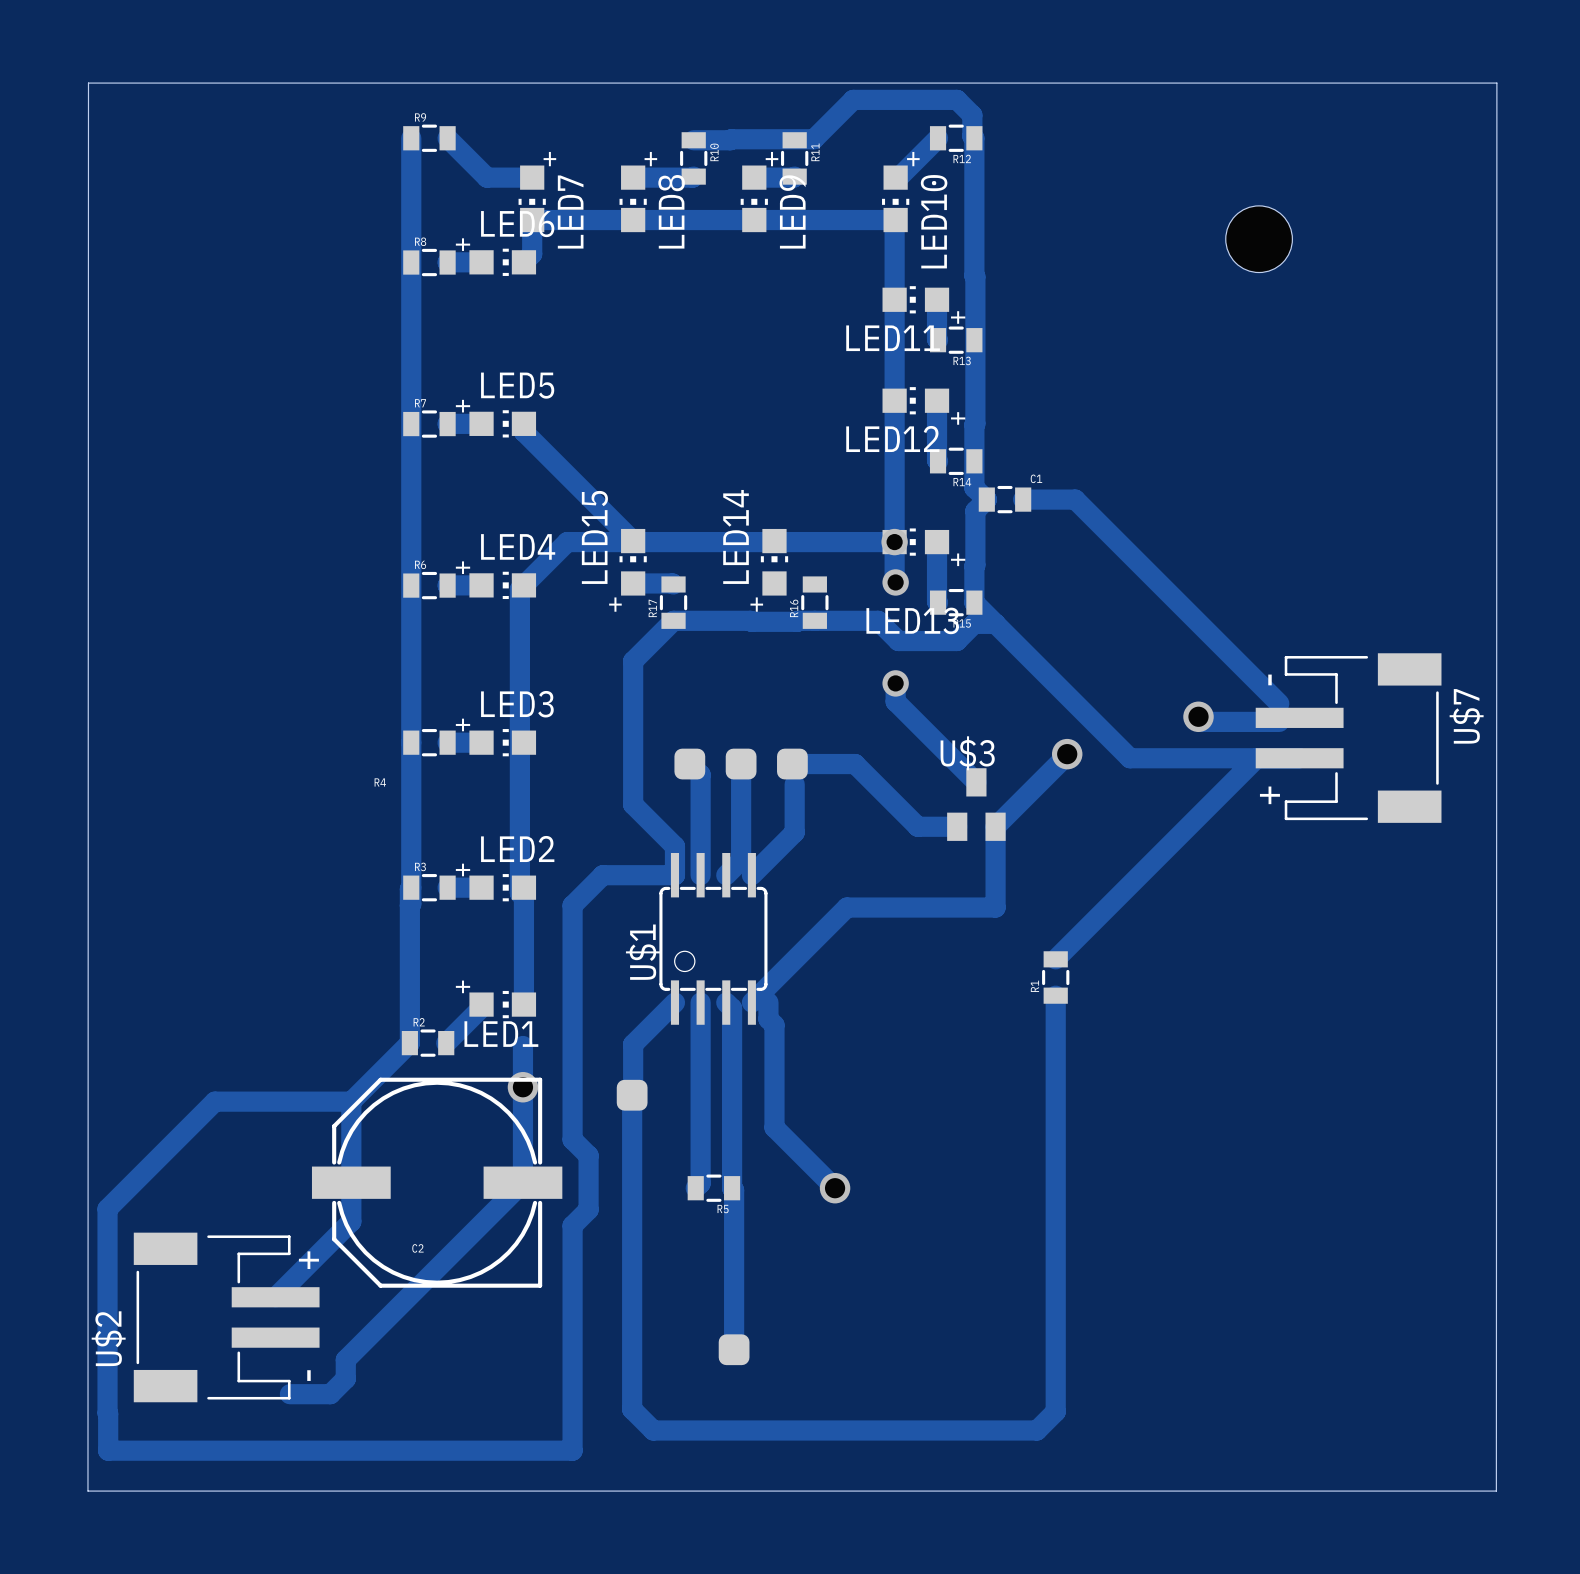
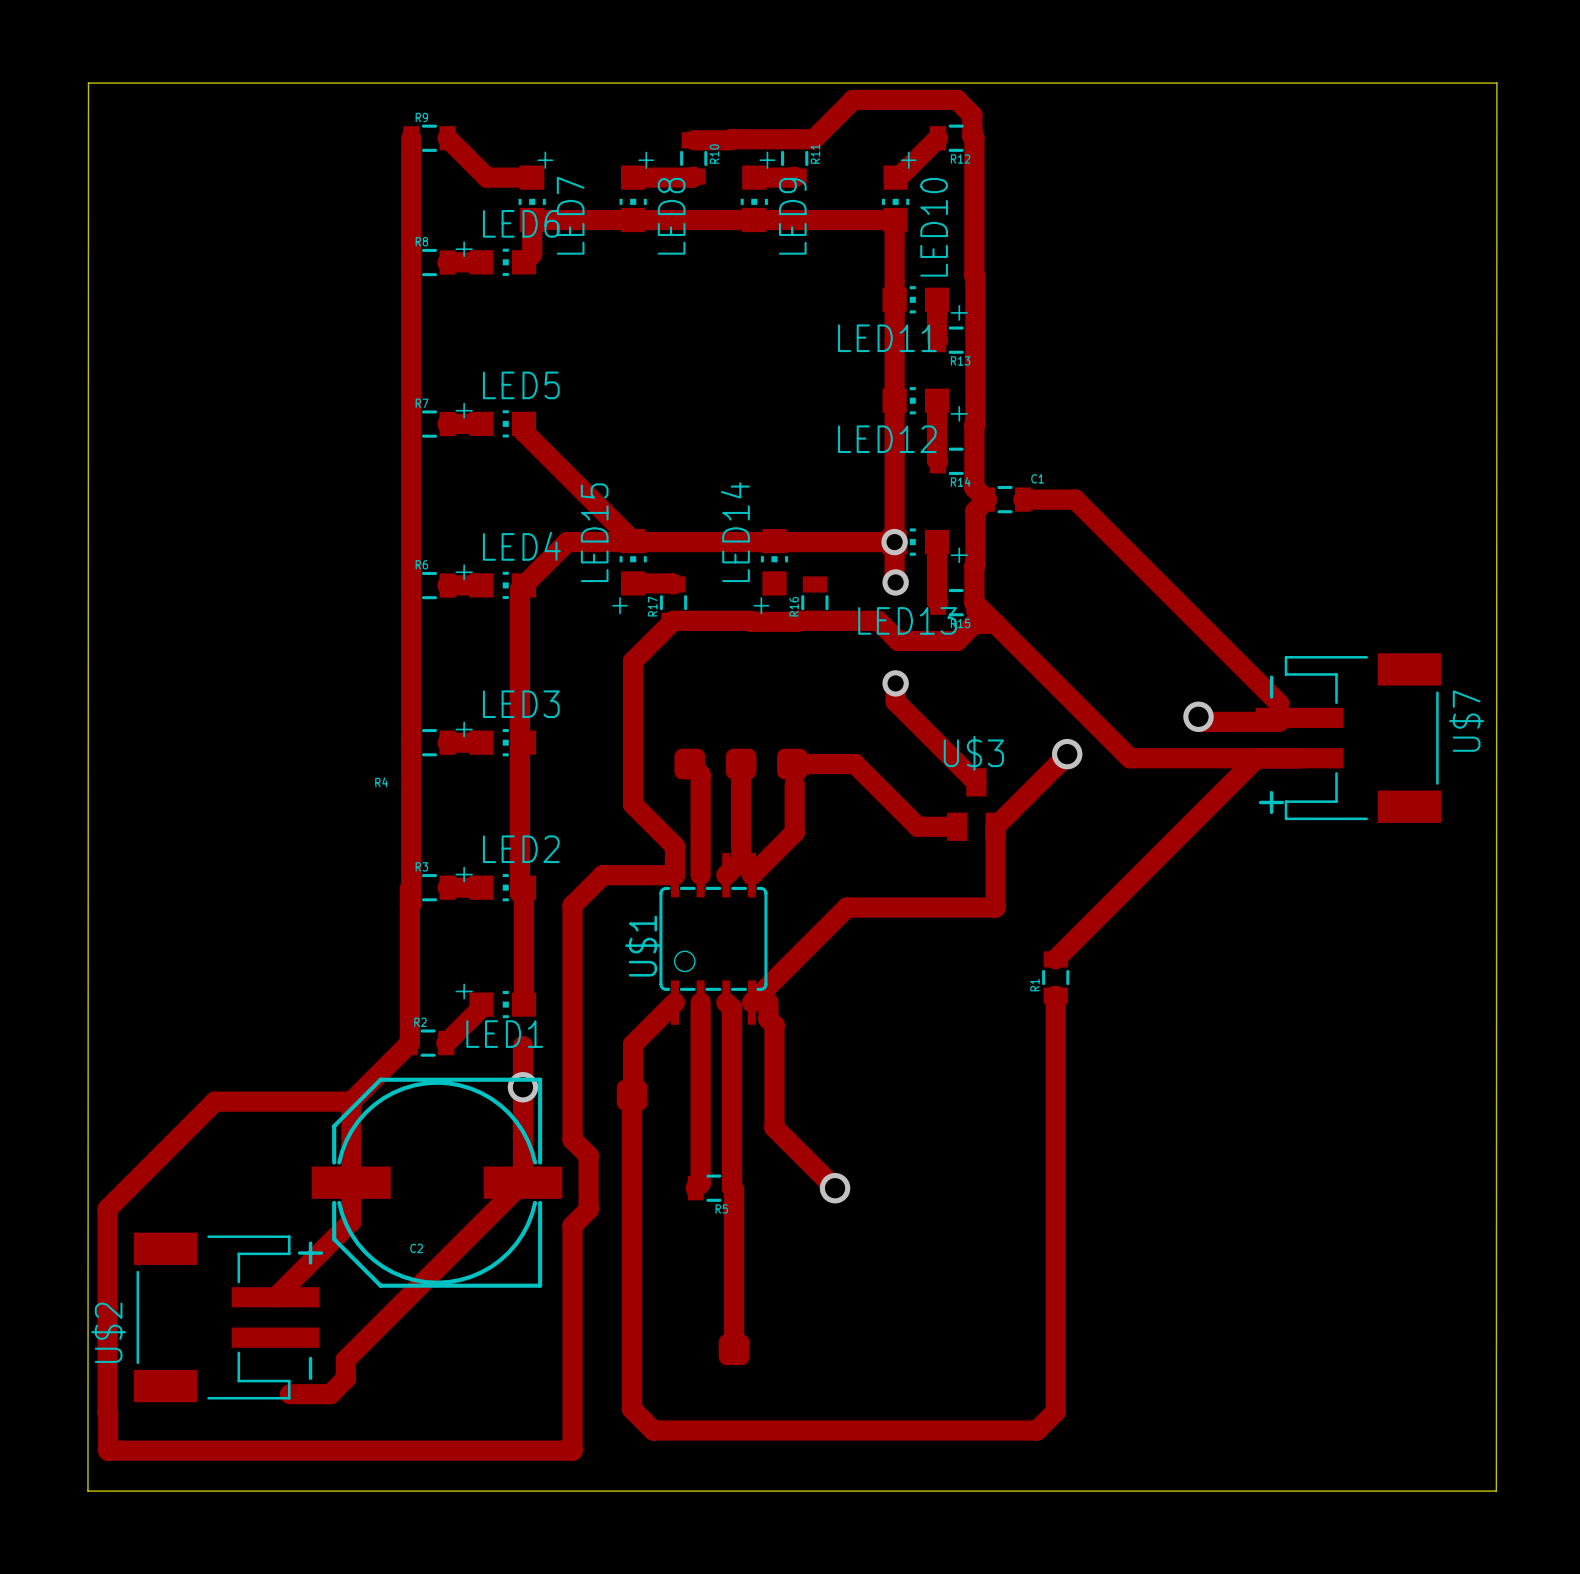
hole: (1259, 239) -> none

